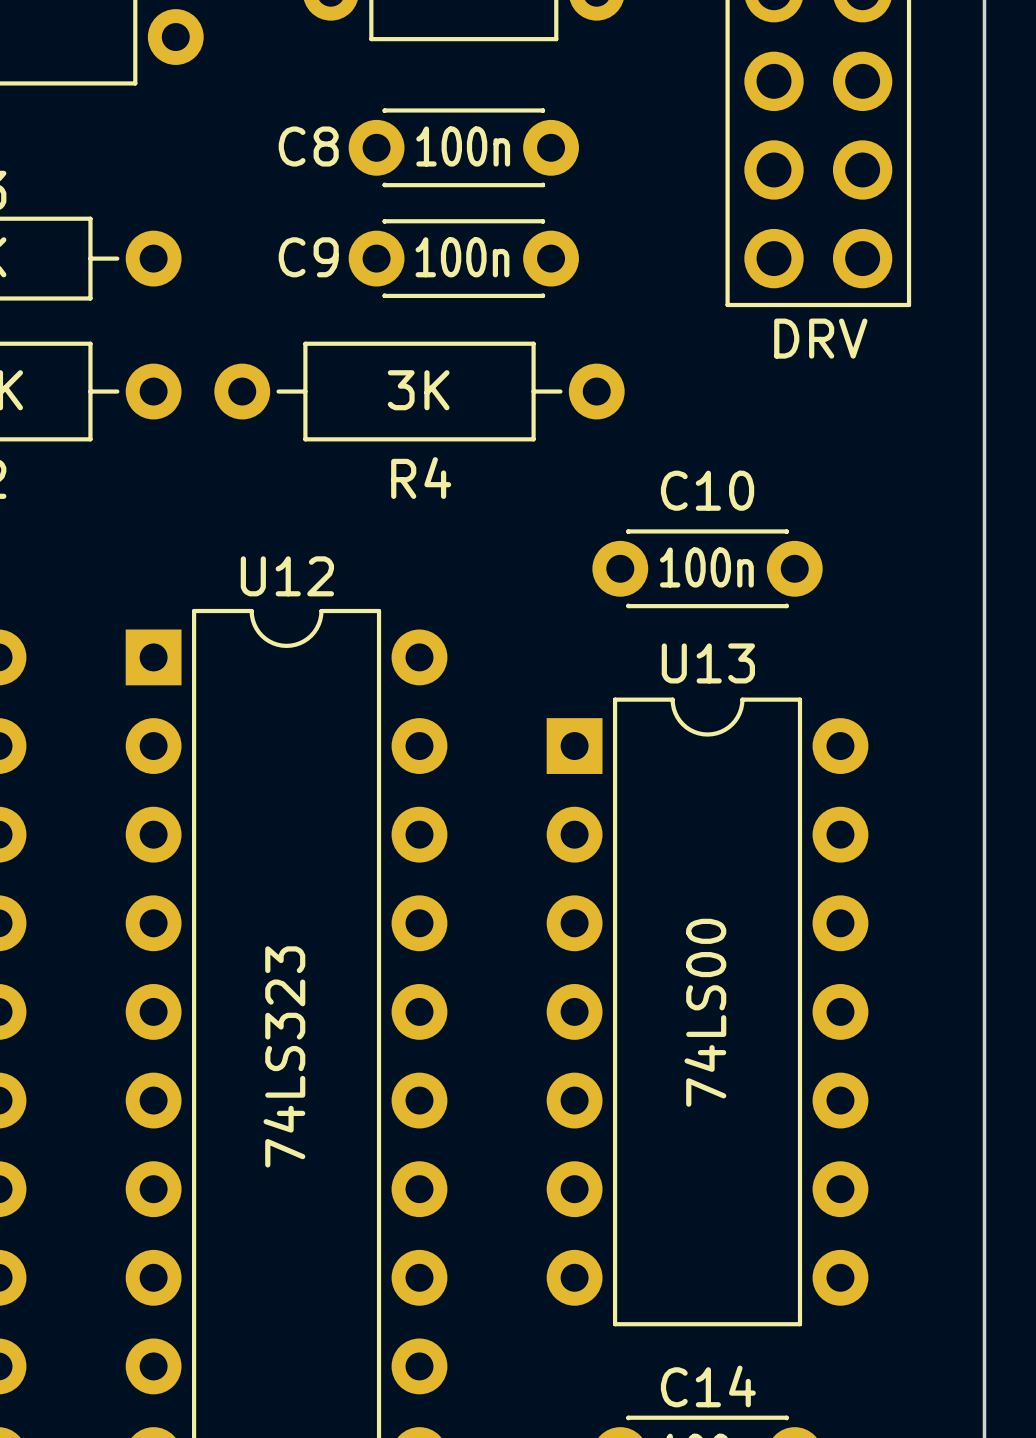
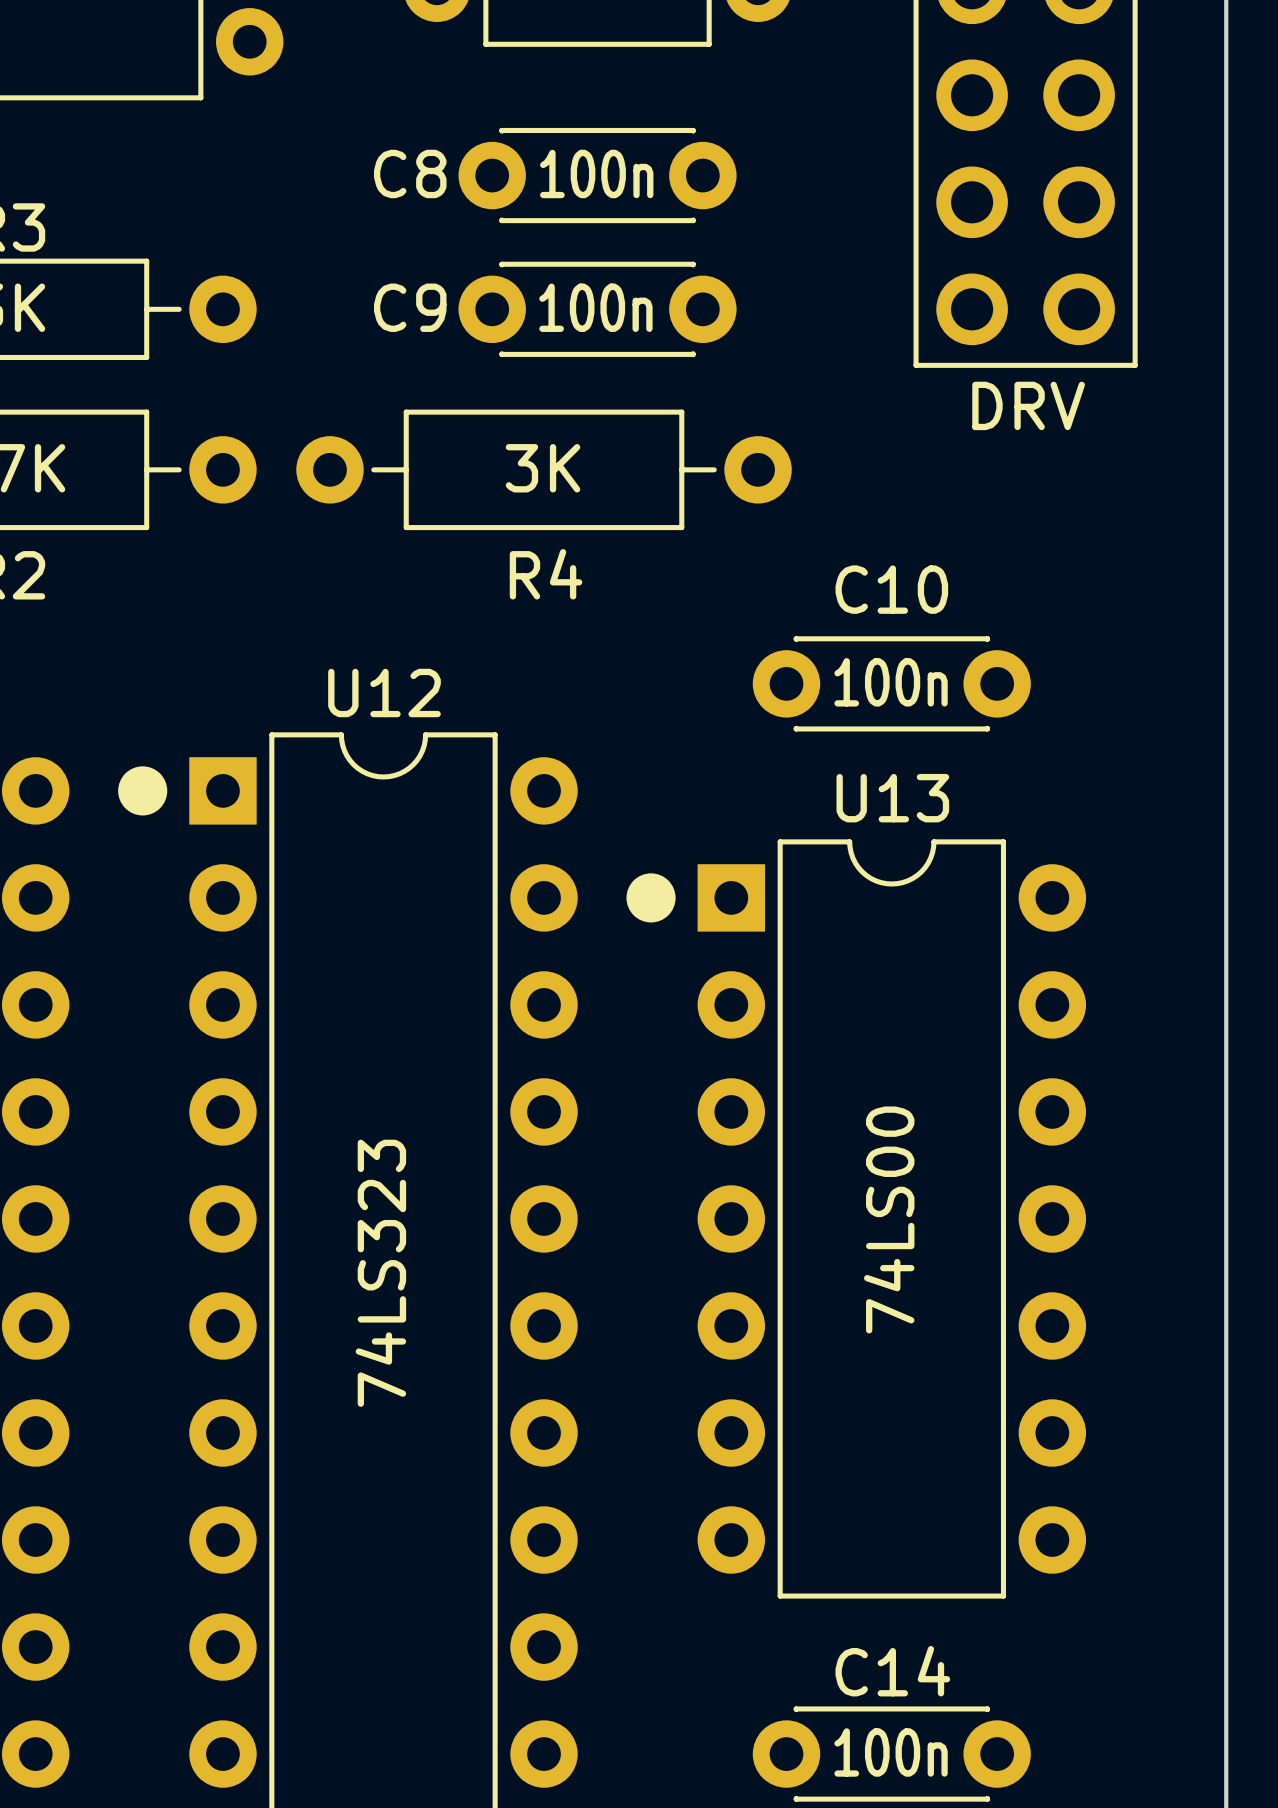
drawing: none -> [118, 766, 168, 816]
drawing: none -> [626, 873, 676, 923]

